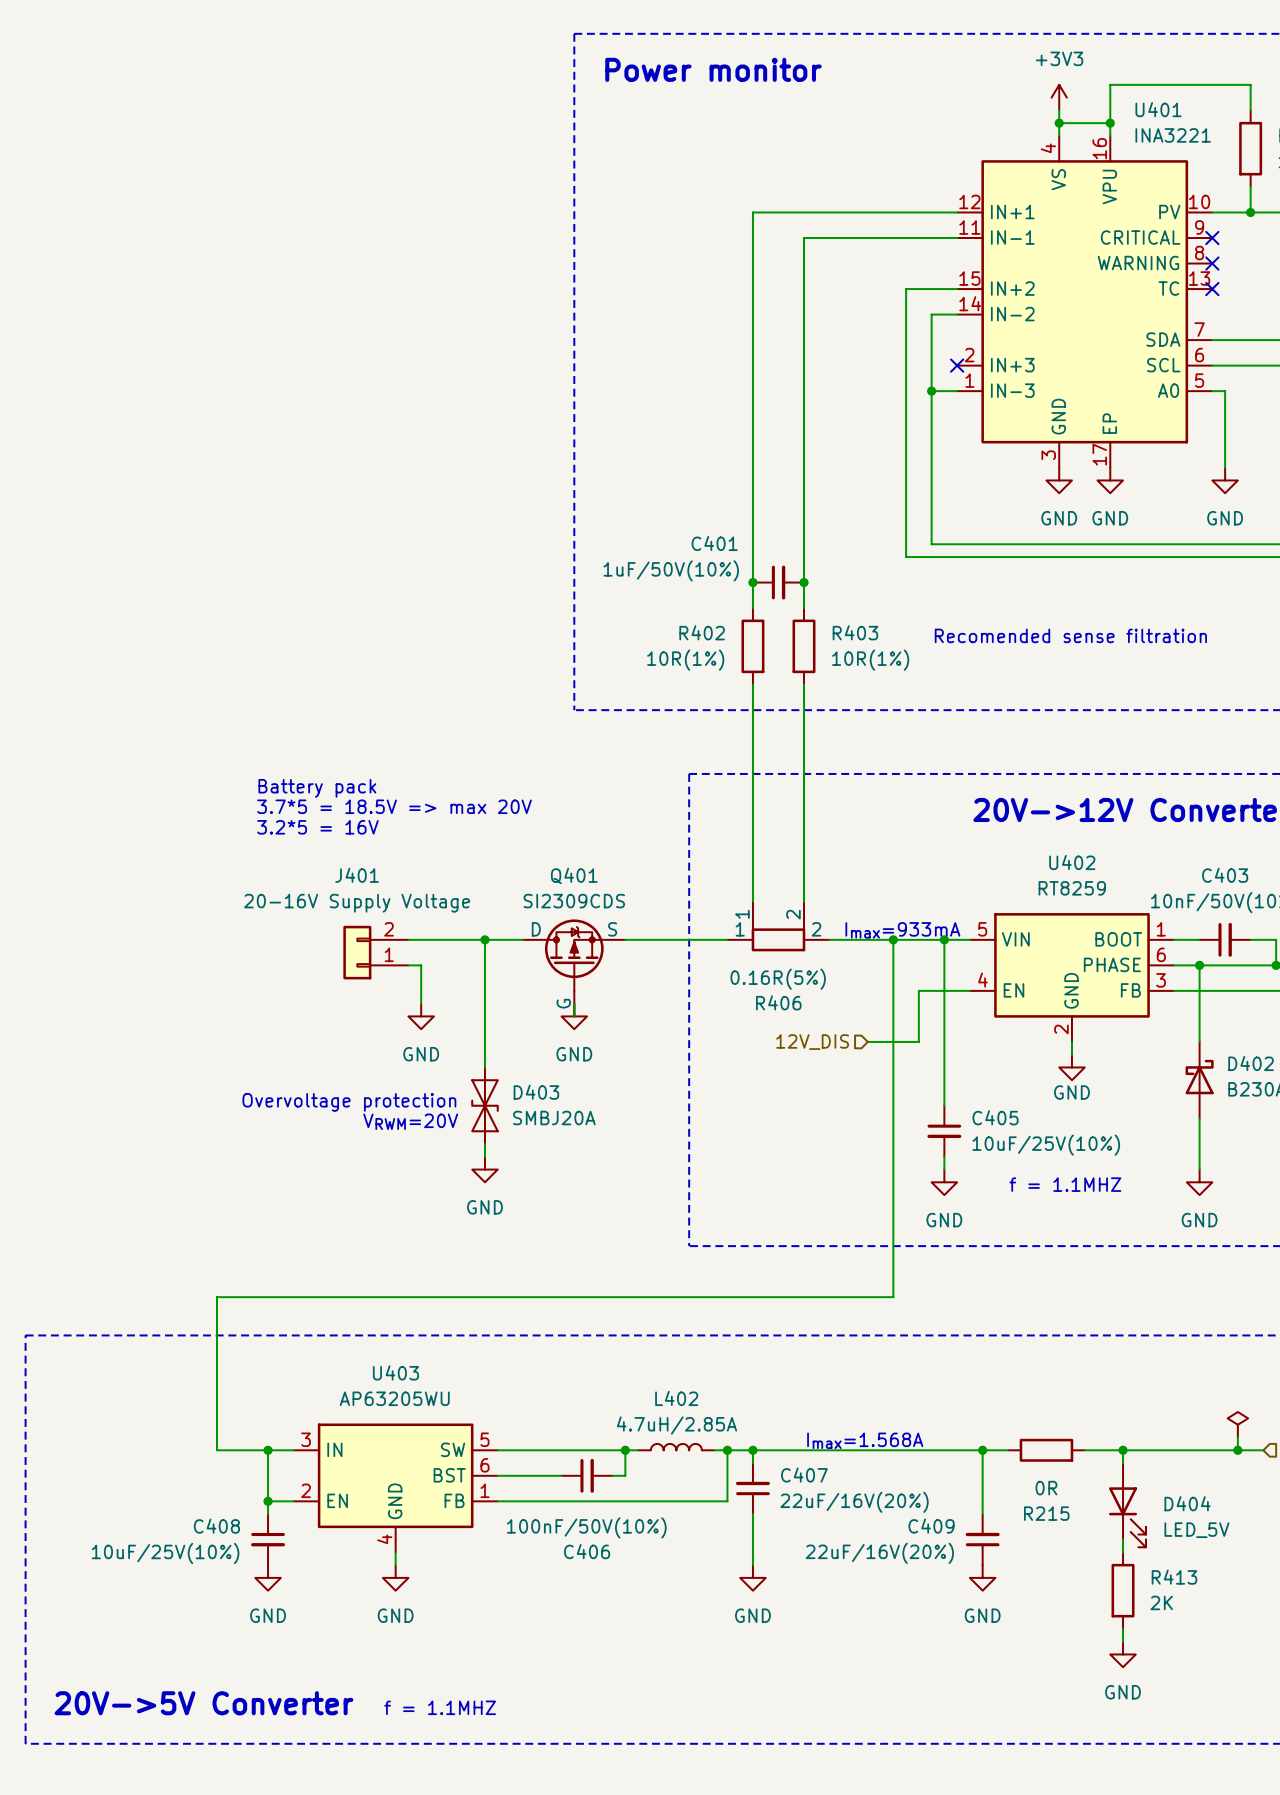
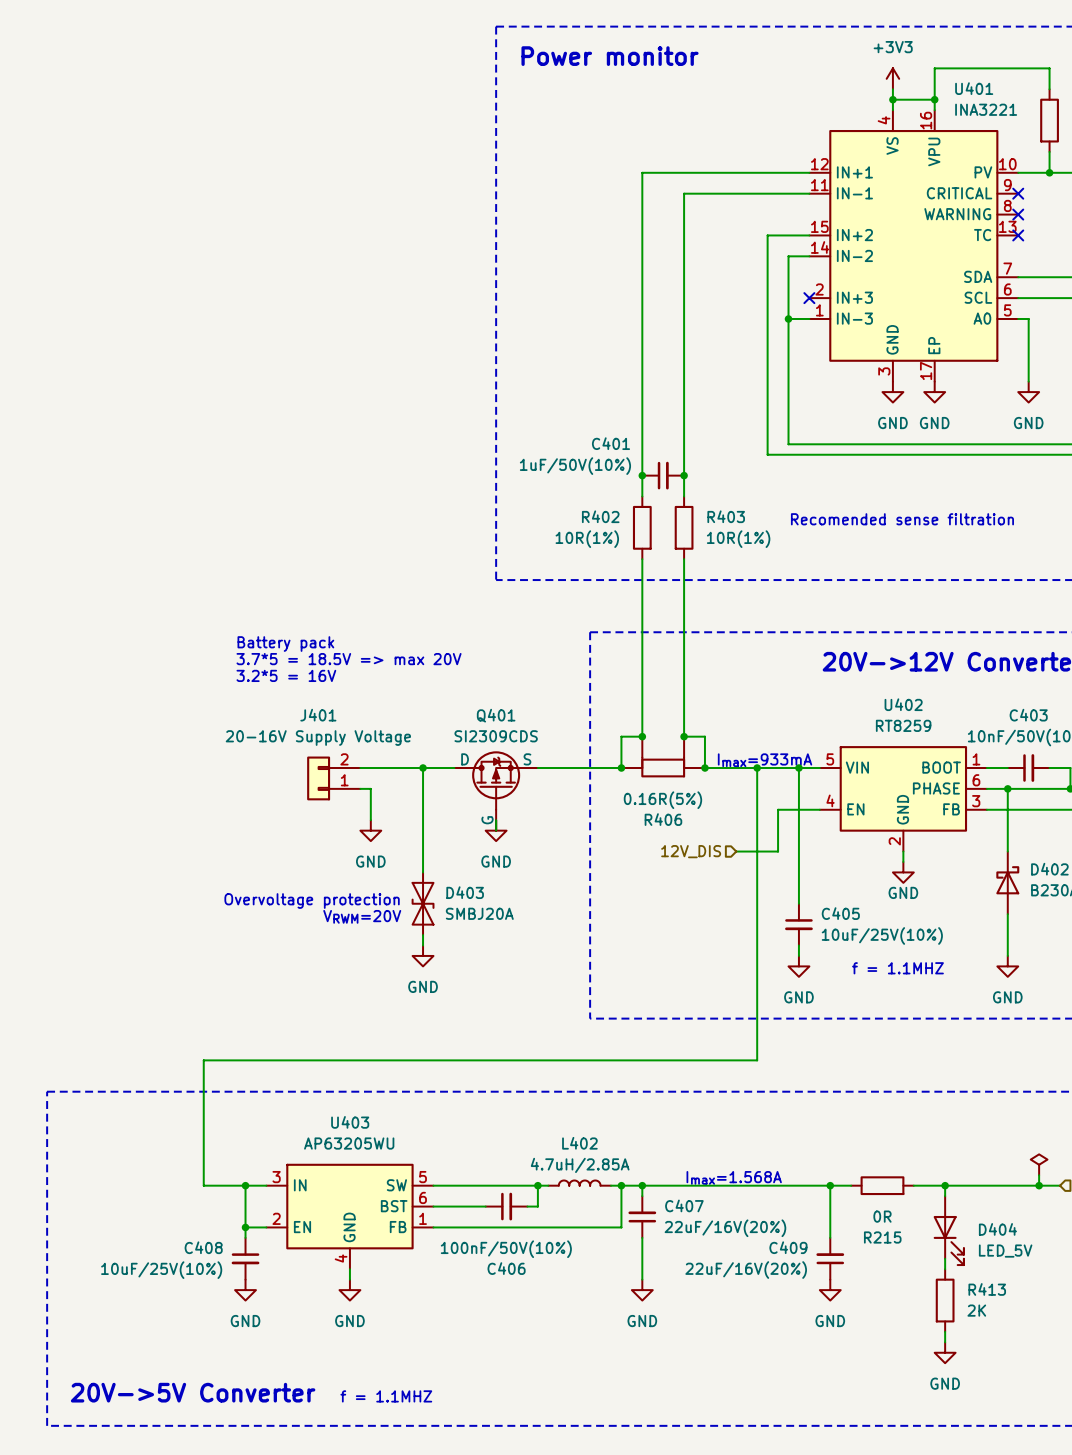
wire: none -> (642, 736) (621, 736) (621, 768)
junction: none -> (642, 736)
wire: none -> (684, 736) (704, 736) (704, 768)
junction: none -> (684, 736)
R406 pin name: 1 (742, 914) -> none
R406 pin name: 2 (793, 914) -> none
R406 pin name: 1 (740, 929) -> none
R406 pin name: 2 (816, 929) -> none
junction: none -> (621, 768)
junction: none -> (704, 768)

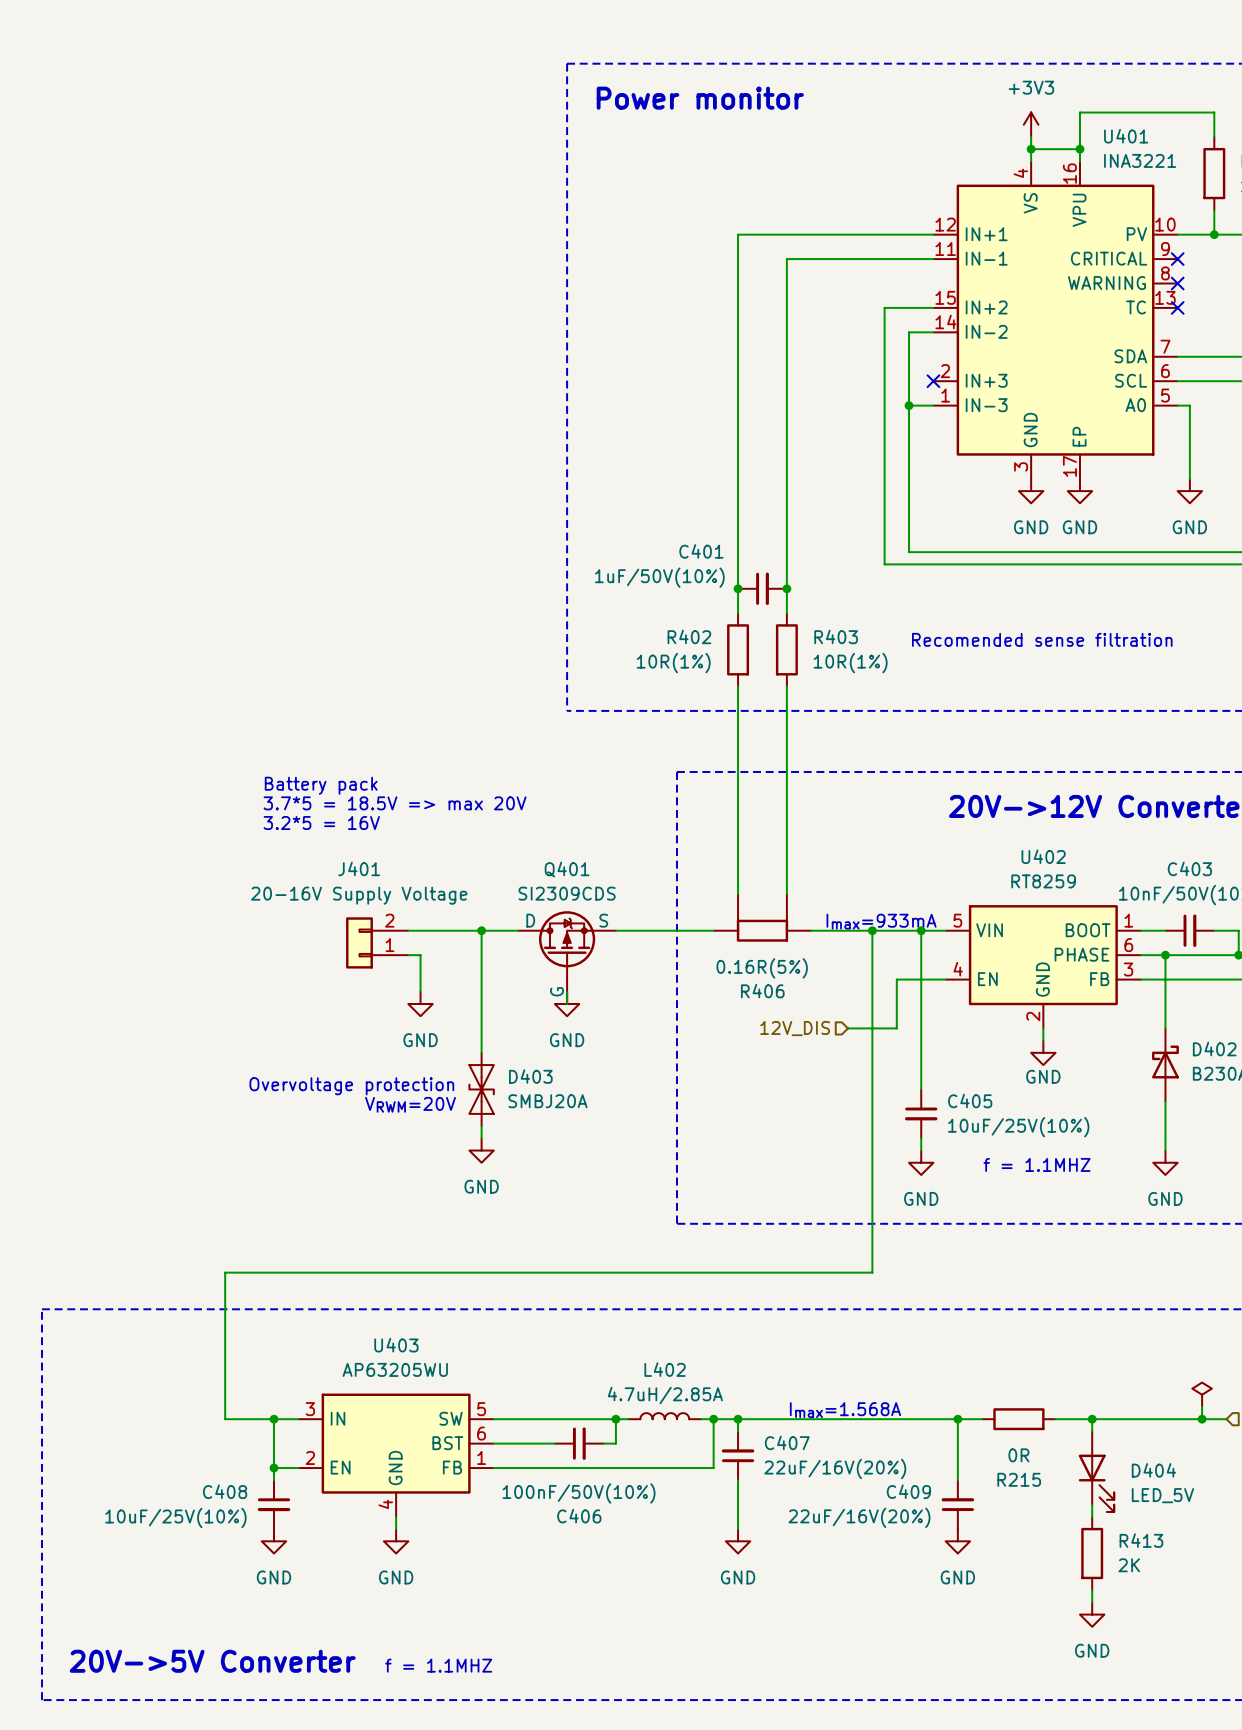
wire: (642, 736) (621, 736) (621, 768) -> none
junction: (642, 736) -> none
wire: (684, 736) (704, 736) (704, 768) -> none
junction: (684, 736) -> none
junction: (621, 768) -> none
junction: (704, 768) -> none

